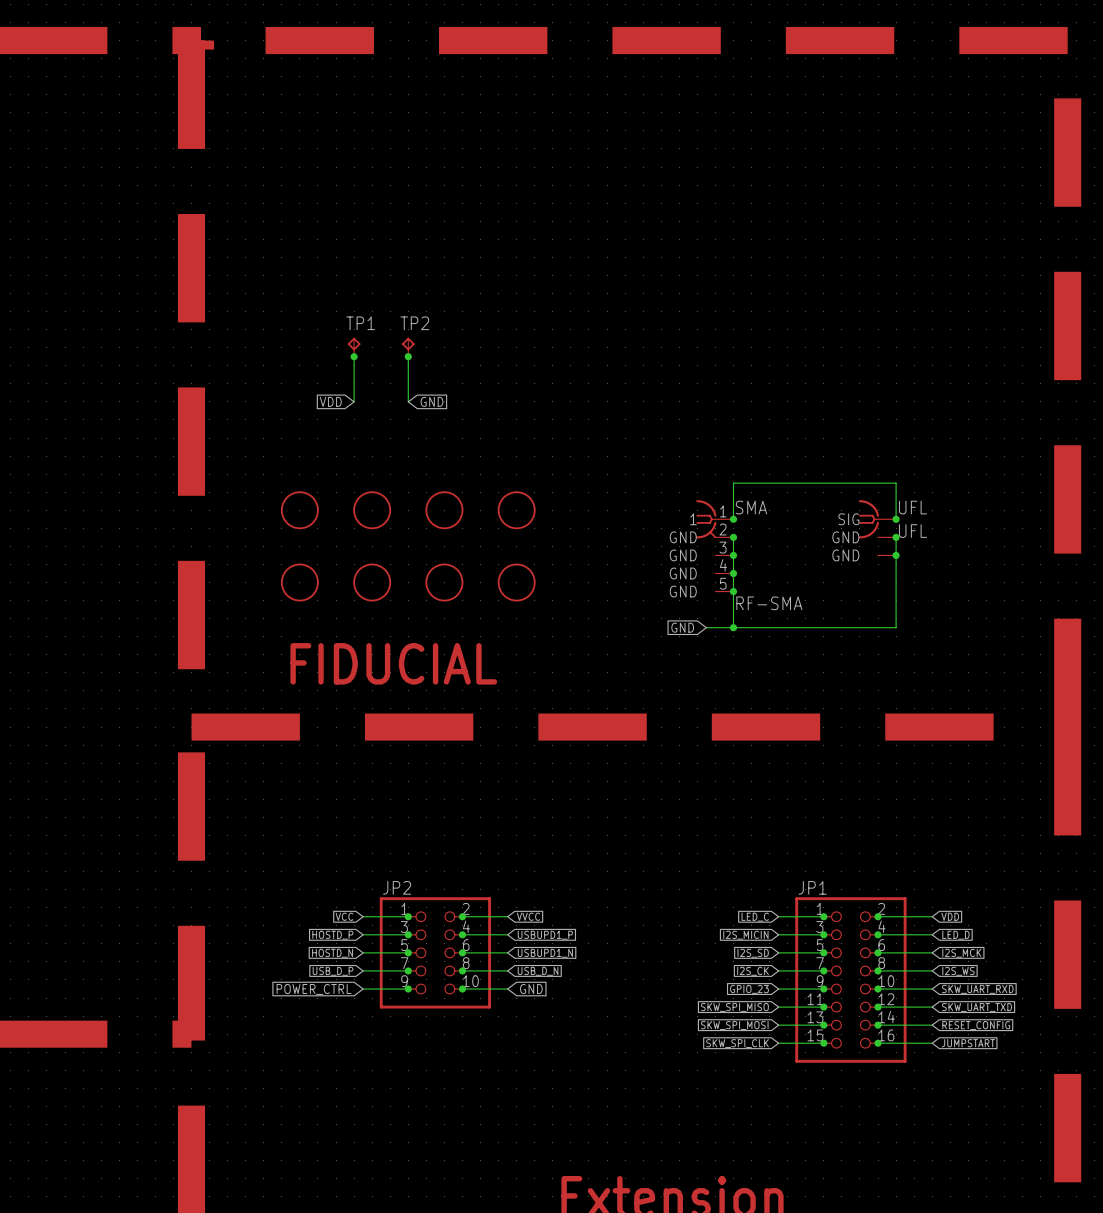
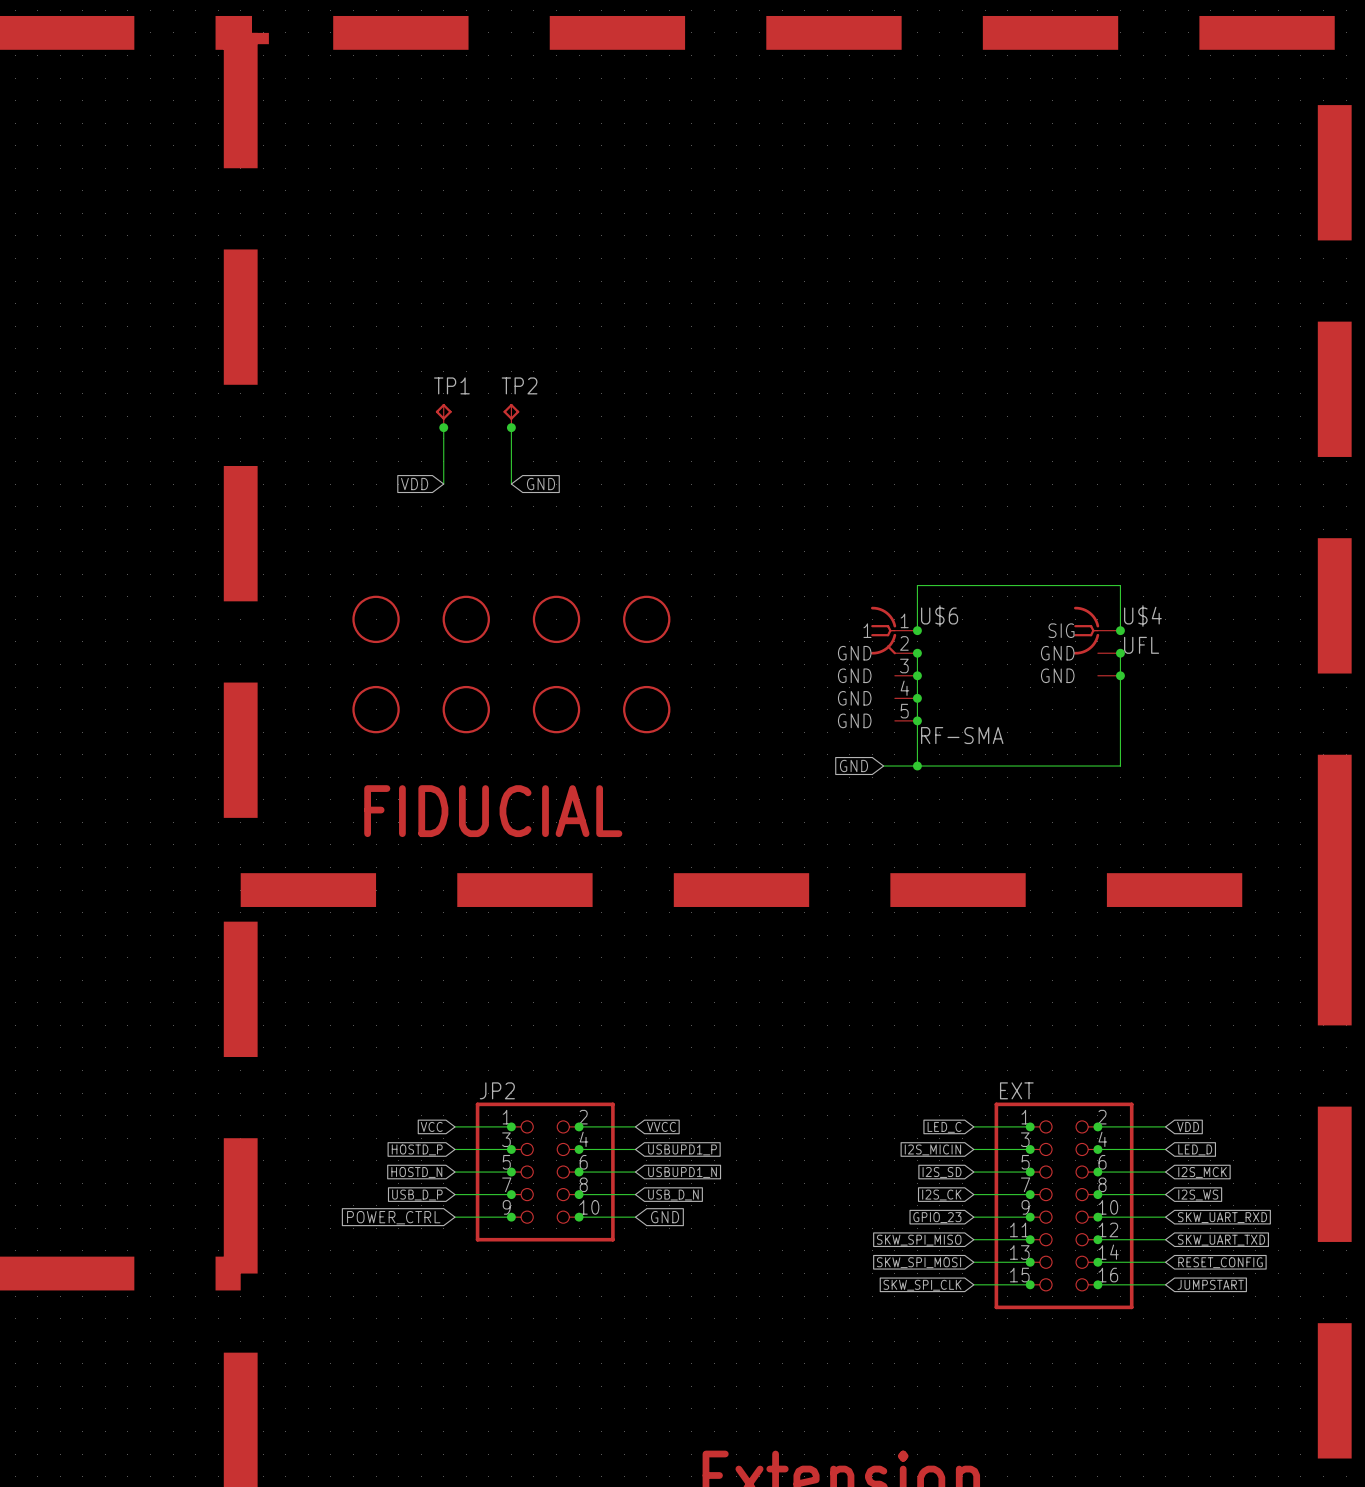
SMA name: SMA (751, 507) -> U$6 (939, 616)
UFL name: UFL (913, 507) -> U$4 (1142, 616)
JP1 name: JP1 (812, 887) -> EXT (1016, 1090)

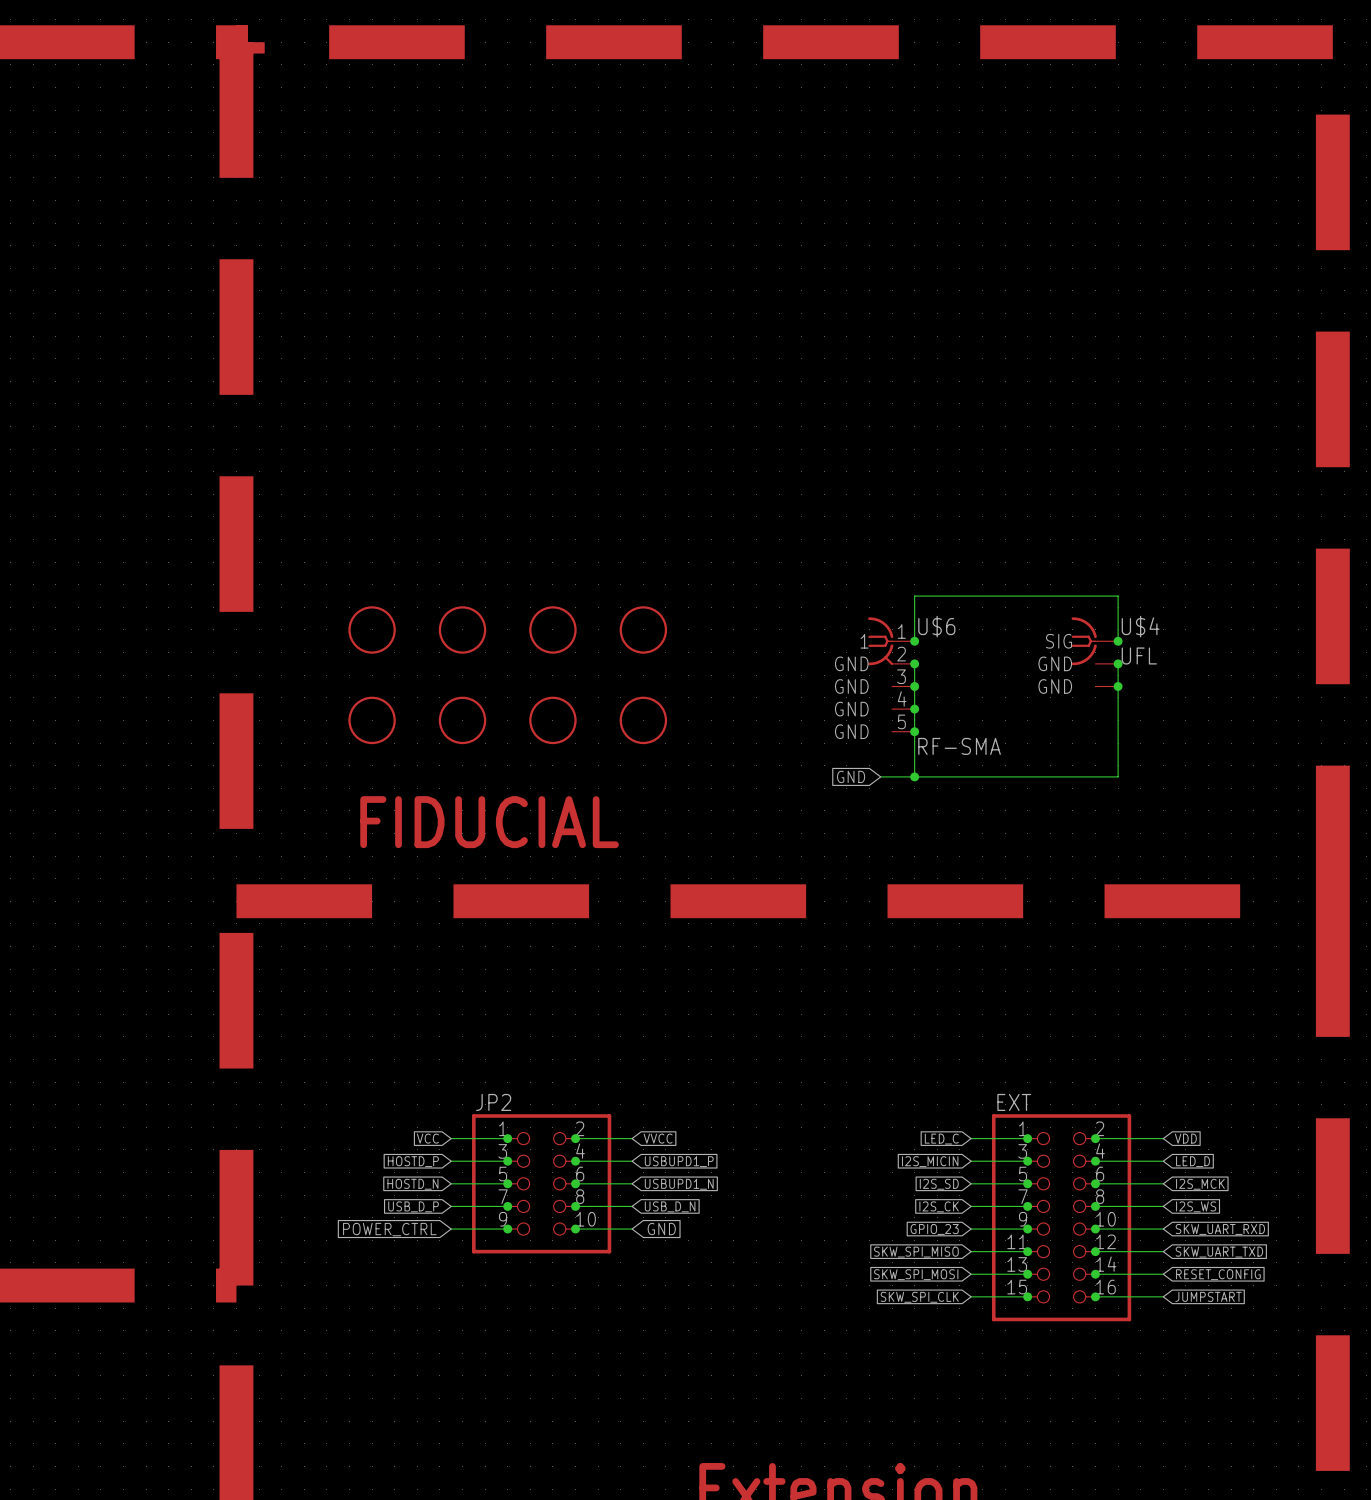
TP1: (443, 415) -> none
TP2: (511, 415) -> none
wire: (443, 427) (443, 484) -> none
junction: (443, 427) -> none
wire: (511, 427) (511, 484) -> none
junction: (511, 427) -> none
global label: VDD (414, 484) -> none
global label: GND (540, 484) -> none

